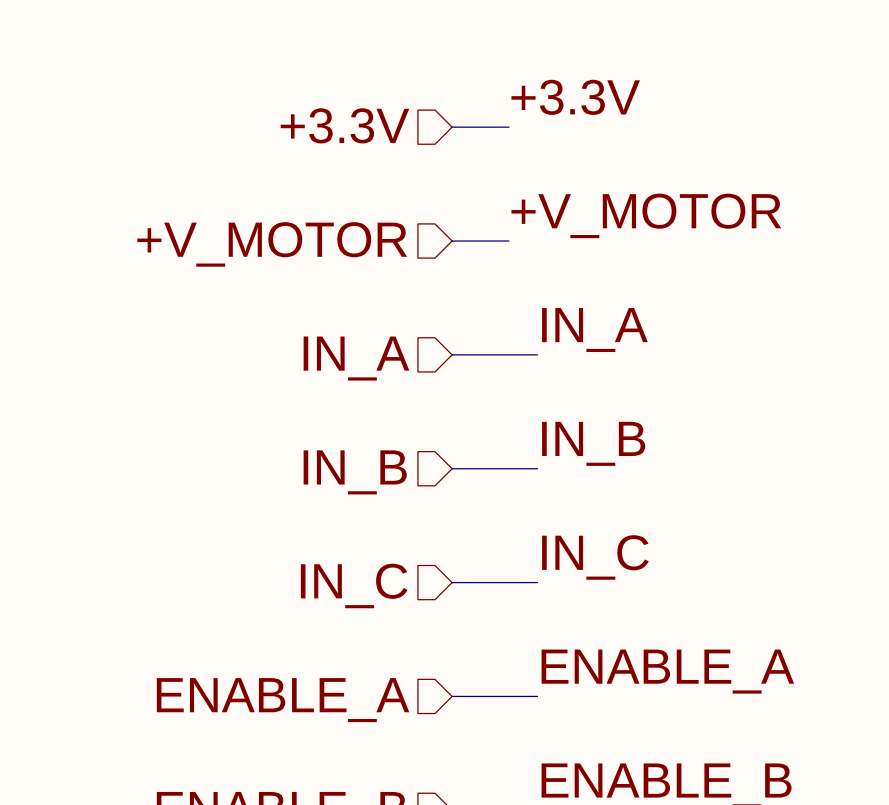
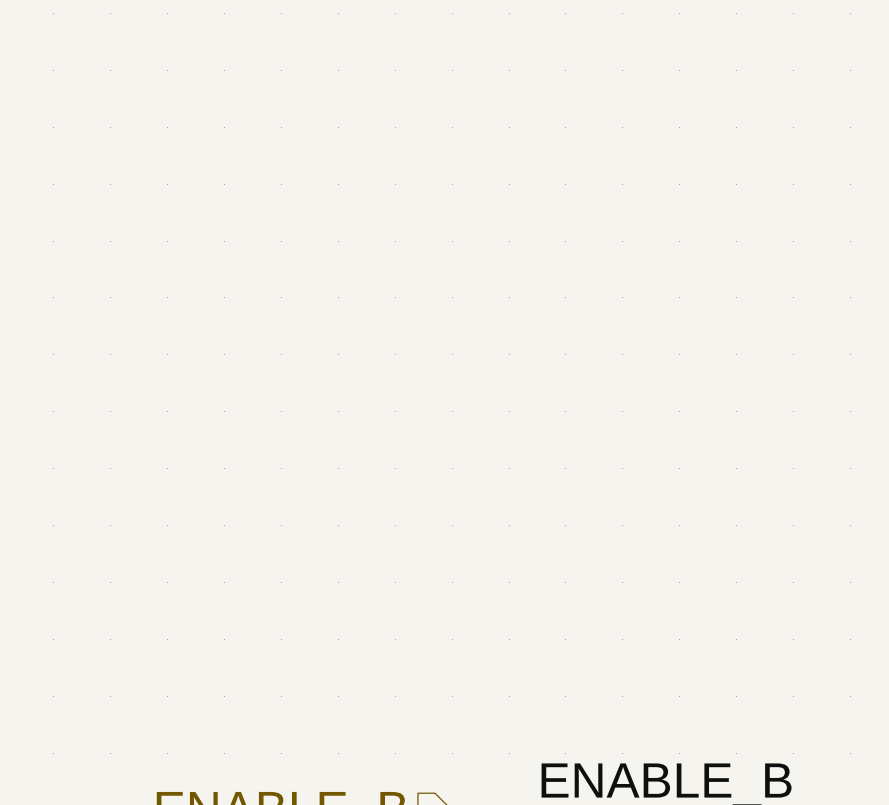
label: +3.3V (575, 97) -> none
hierarchical label: +3.3V (344, 125) -> none
wire: (452, 127) (509, 127) -> none
label: +V_MOTOR (646, 215) -> none
wire: (452, 241) (509, 241) -> none
hierarchical label: +V_MOTOR (272, 244) -> none
label: IN_A (594, 330) -> none
wire: (452, 354) (537, 354) -> none
hierarchical label: IN_A (356, 358) -> none
label: IN_B (593, 443) -> none
wire: (452, 468) (537, 468) -> none
hierarchical label: IN_B (355, 472) -> none
label: IN_C (595, 557) -> none
wire: (452, 582) (537, 582) -> none
hierarchical label: IN_C (354, 585) -> none
label: ENABLE_A (667, 671) -> none
wire: (452, 696) (537, 696) -> none
hierarchical label: ENABLE_A (283, 700) -> none

